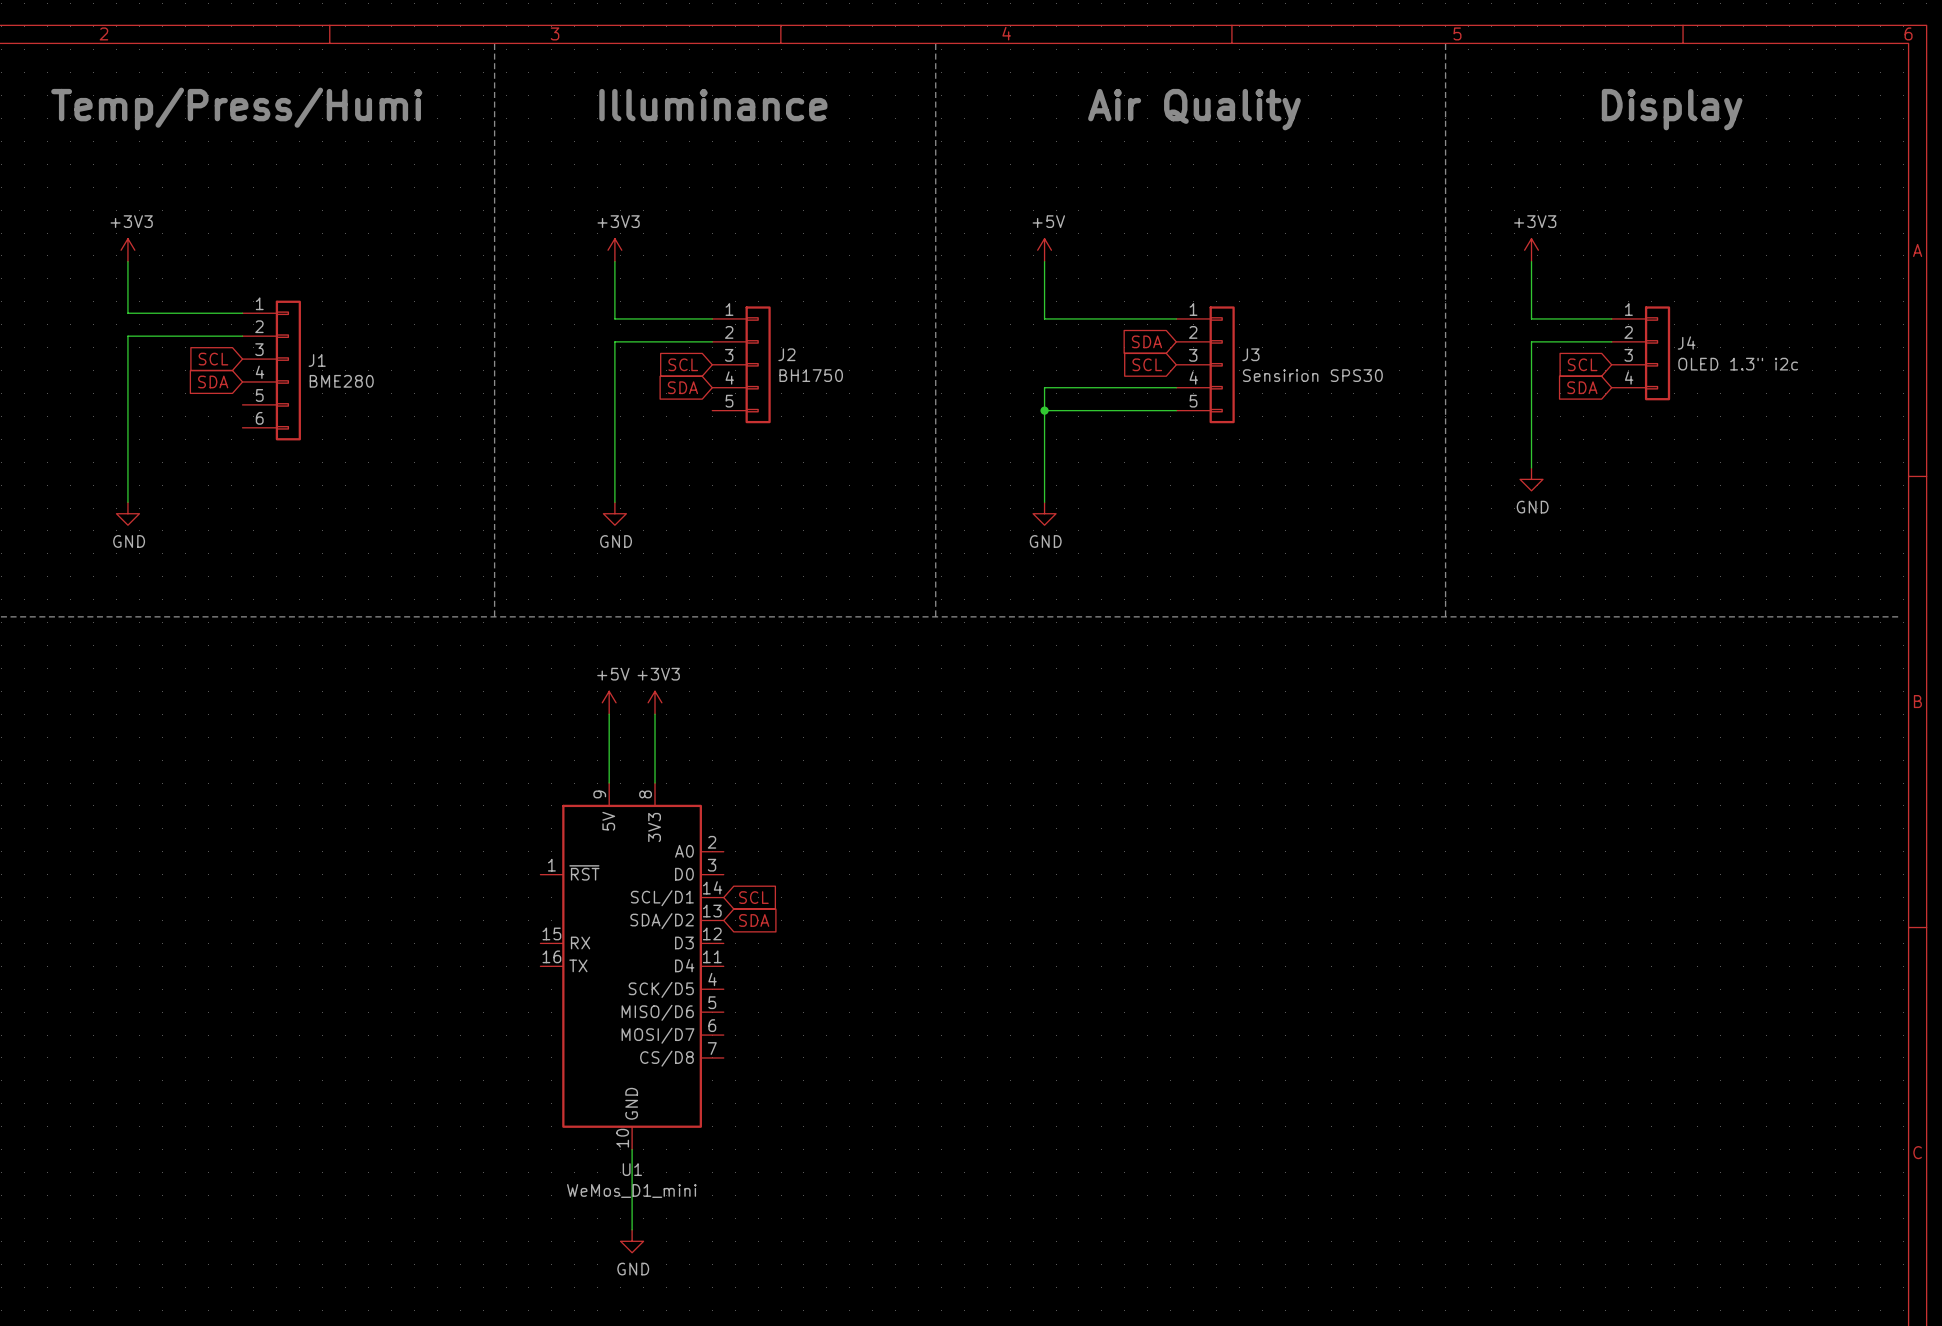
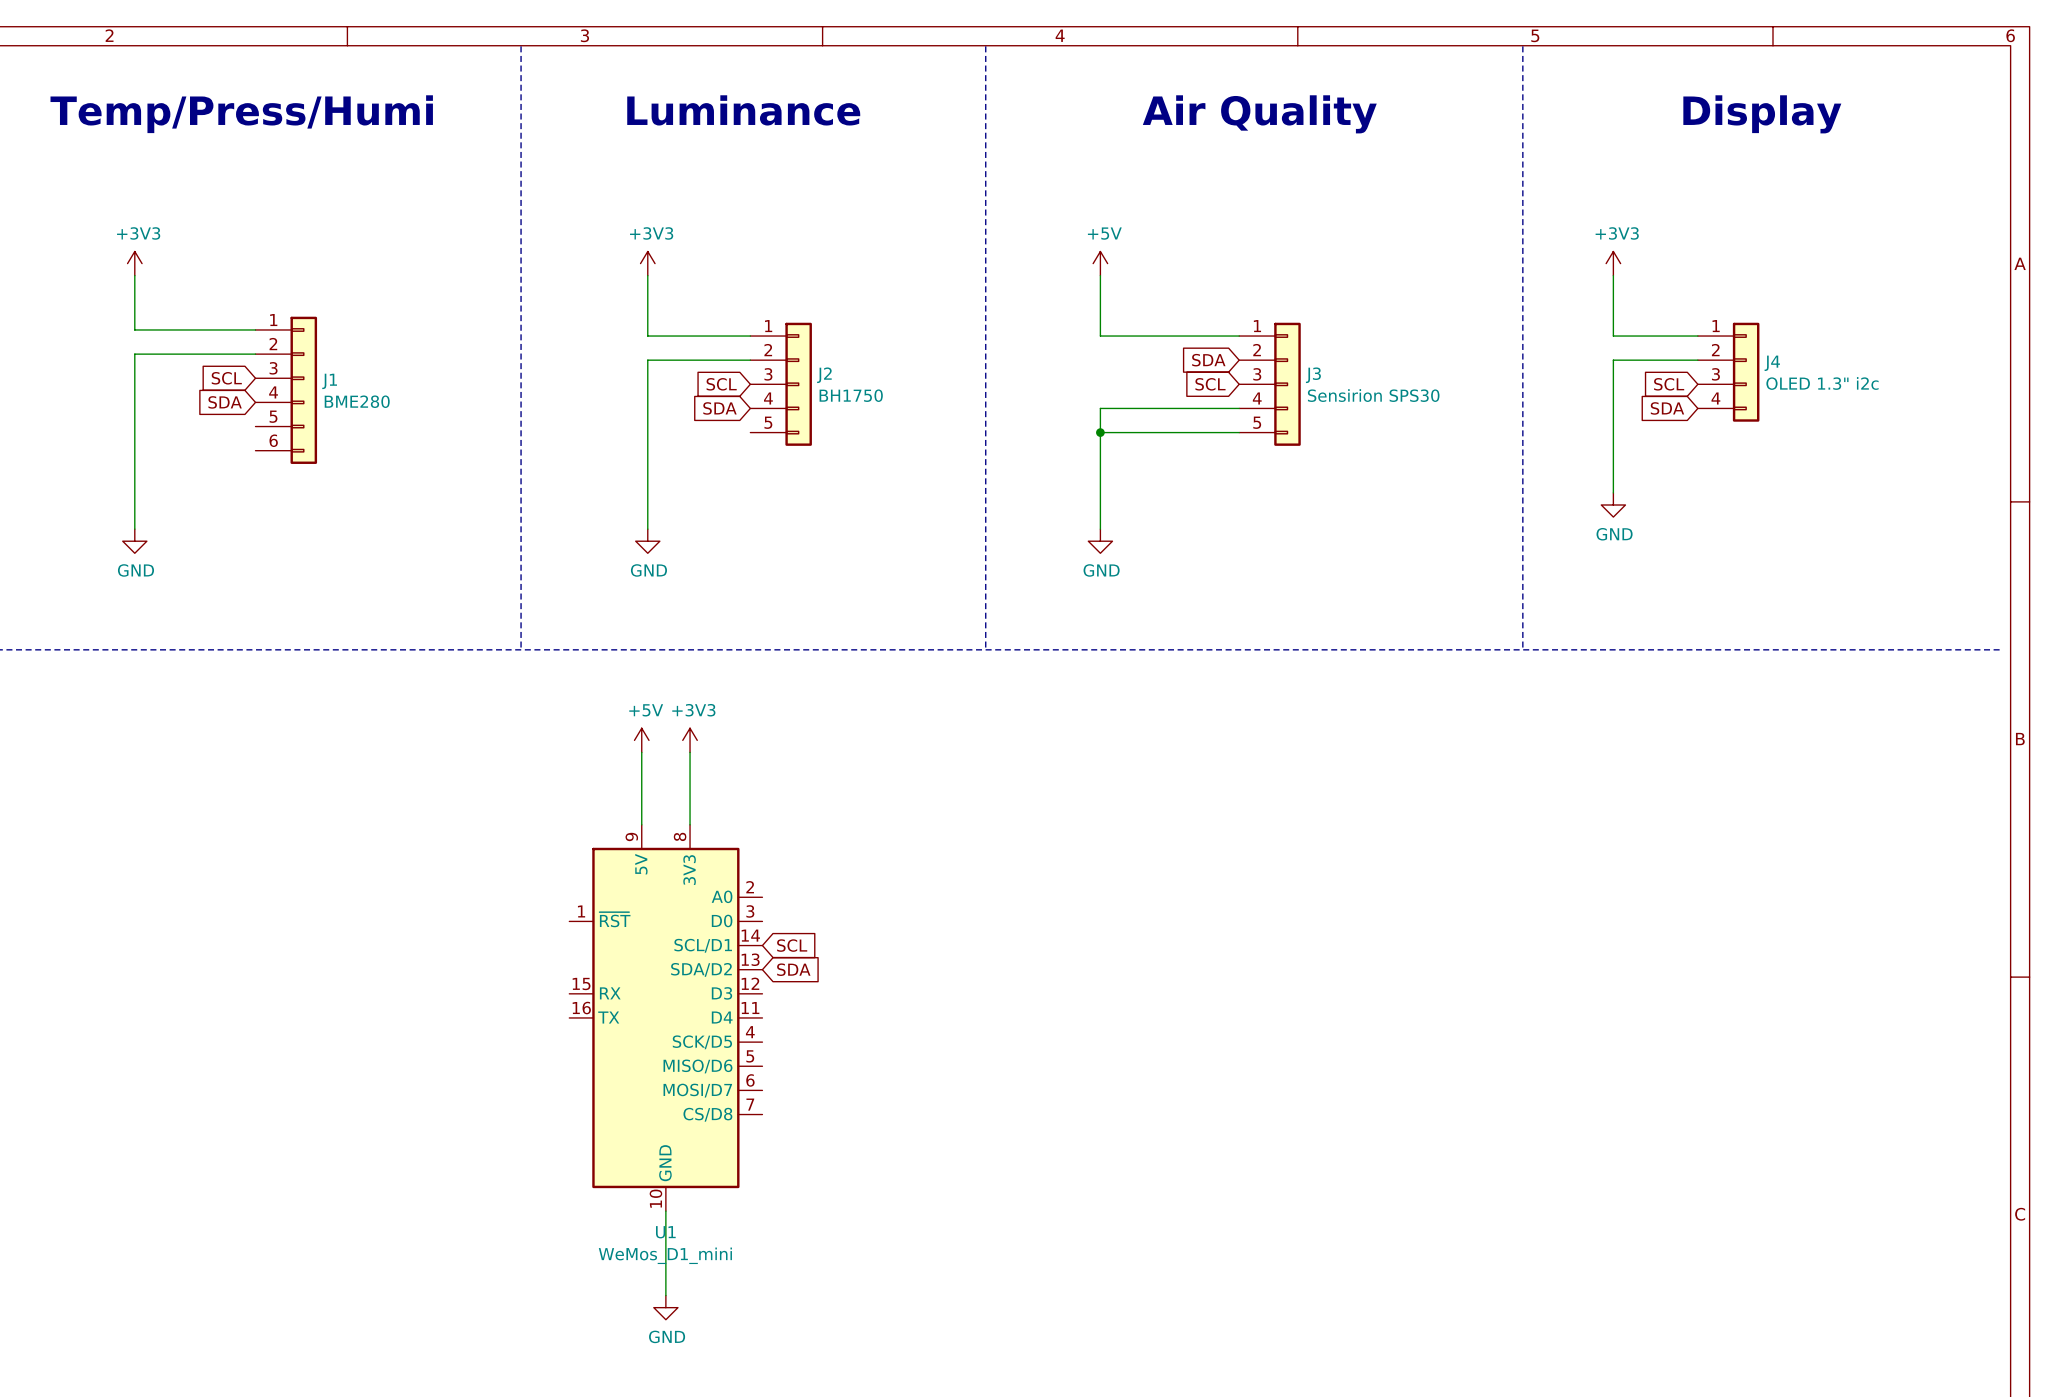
text: Illuminance (713, 105) -> Luminance (743, 110)

